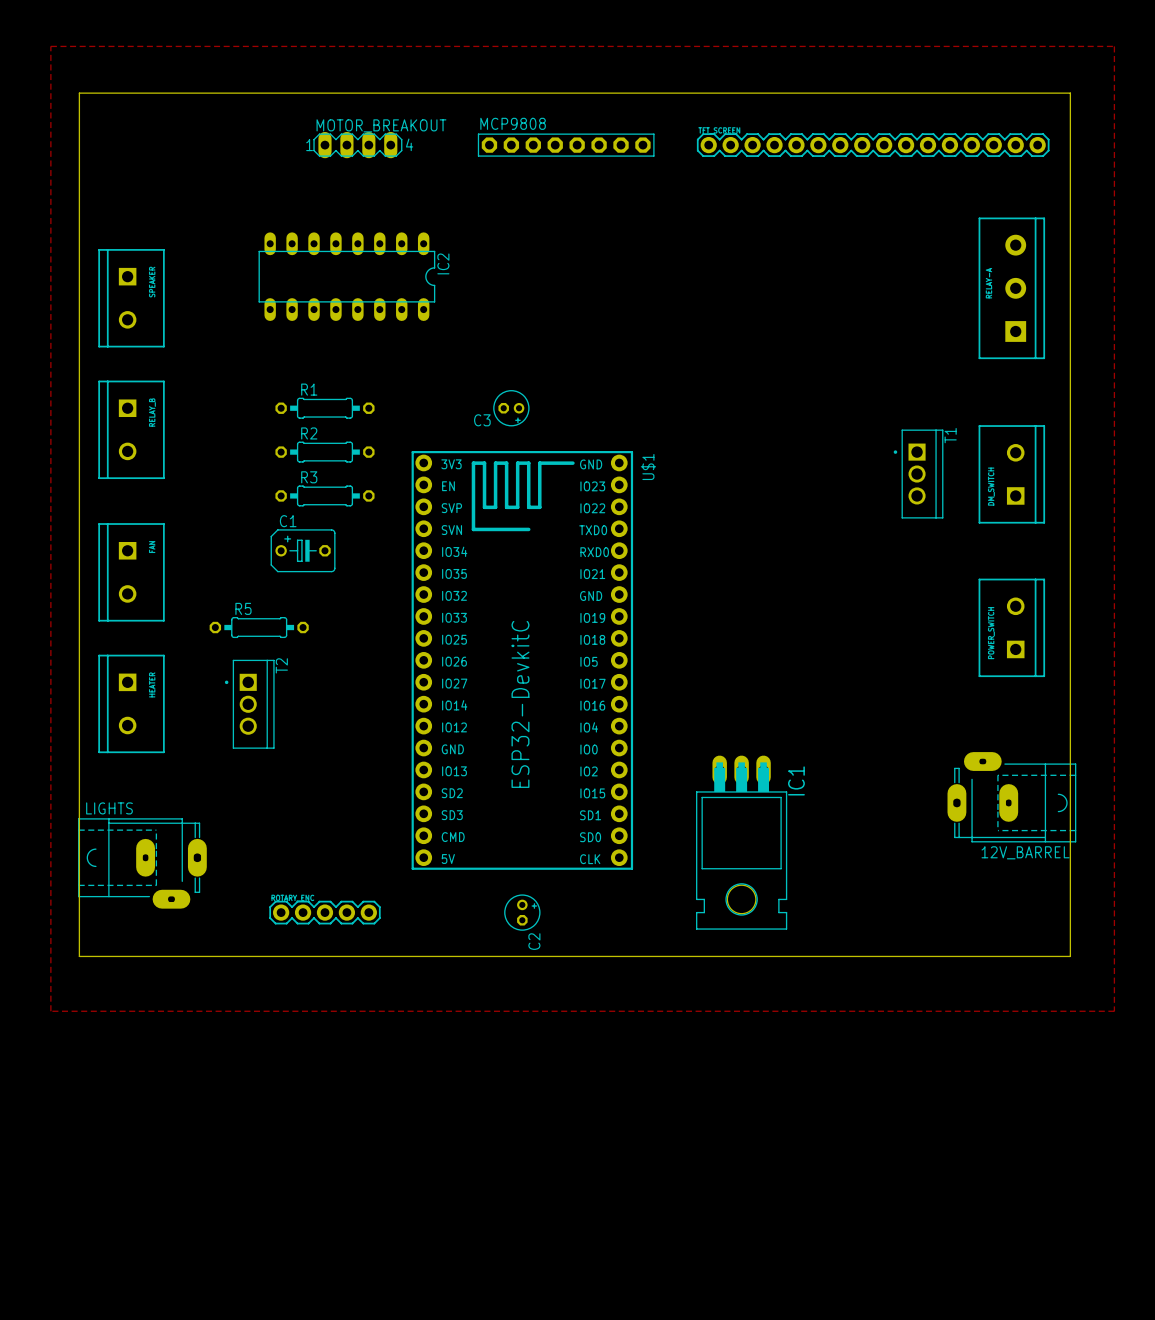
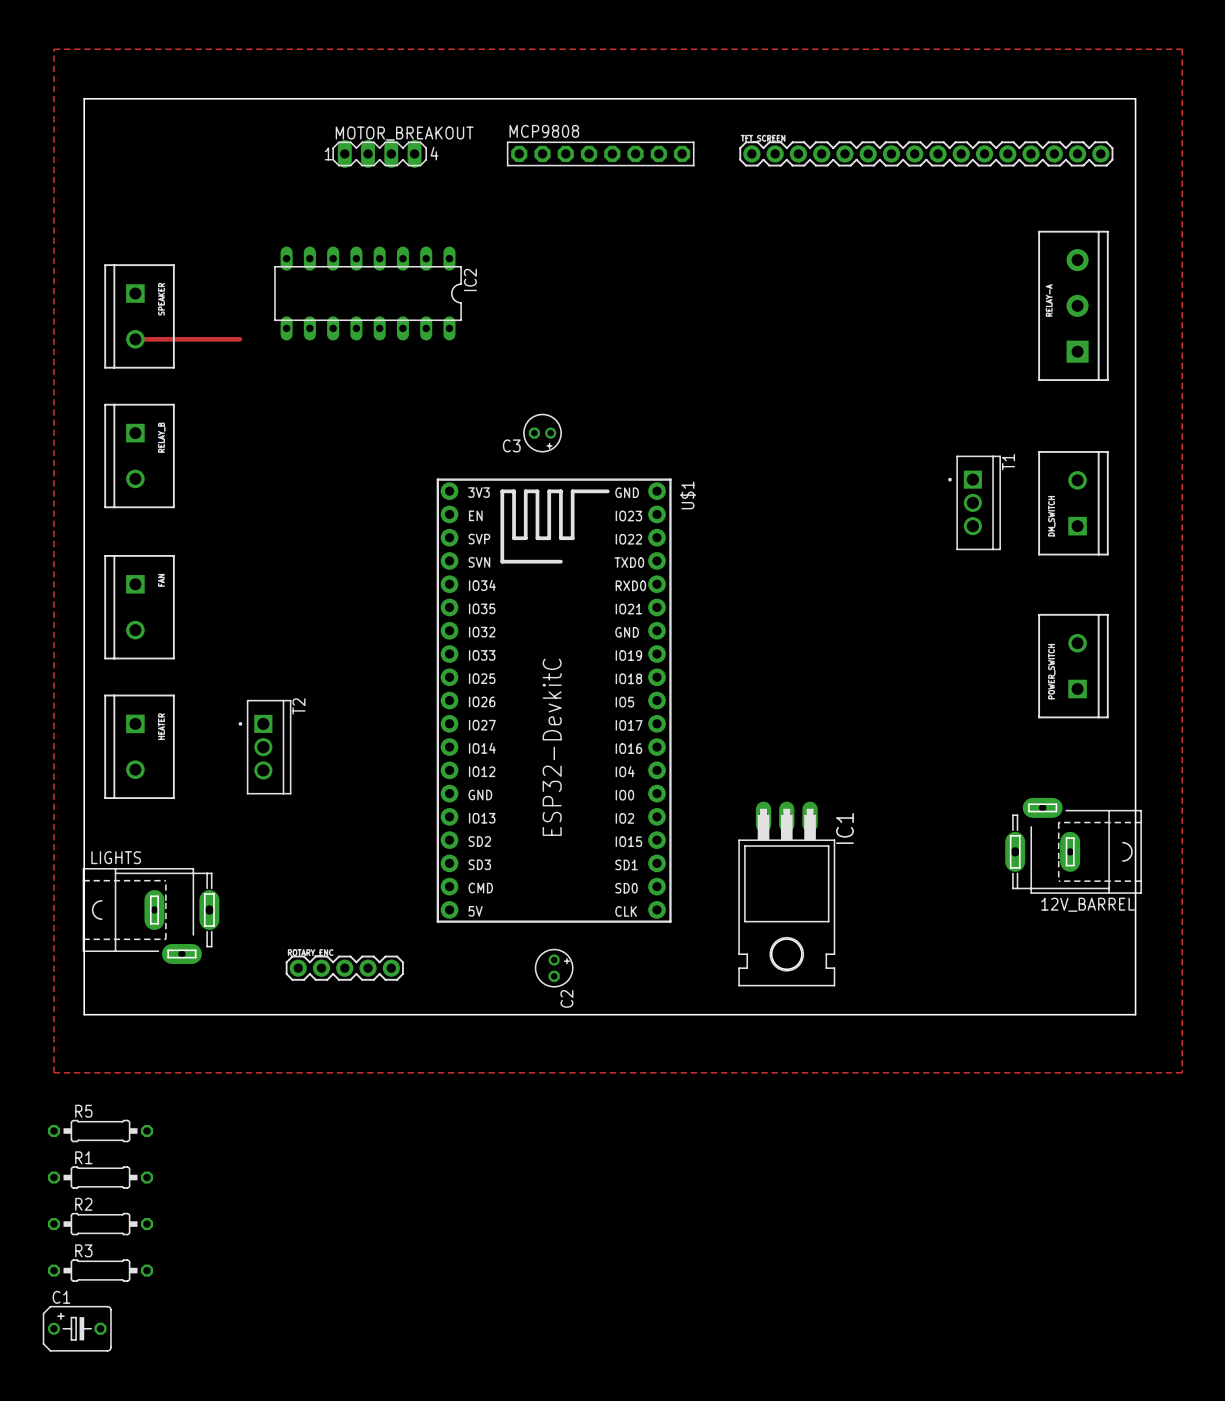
track: none -> (135, 339) (239, 339)
R1 position: (324, 408) -> (100, 1177)
R2 position: (324, 452) -> (100, 1224)
R3 position: (324, 495) -> (100, 1270)
C1 position: (303, 550) -> (77, 1328)
R5 position: (259, 627) -> (100, 1131)

